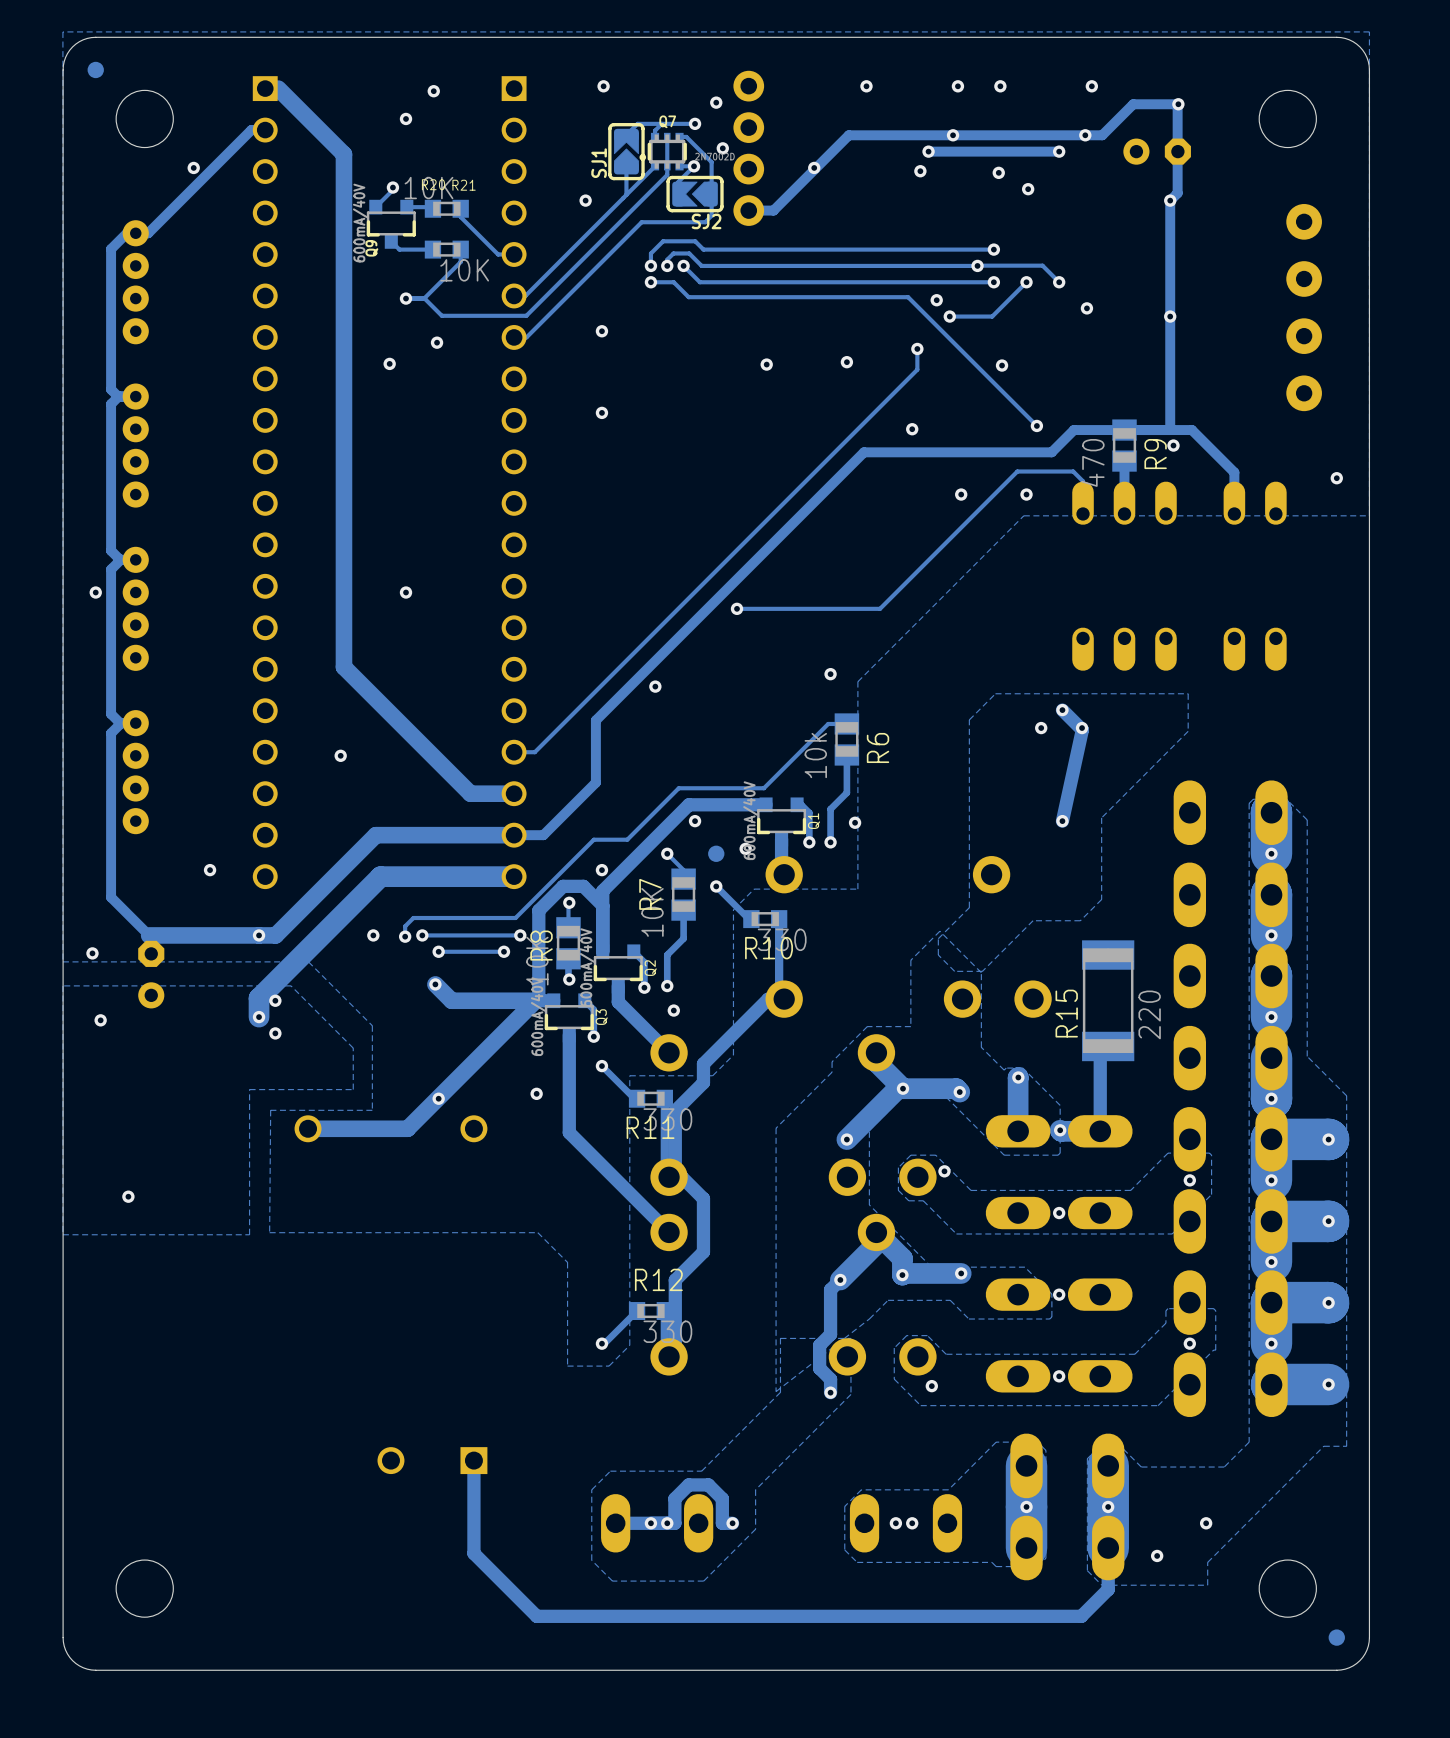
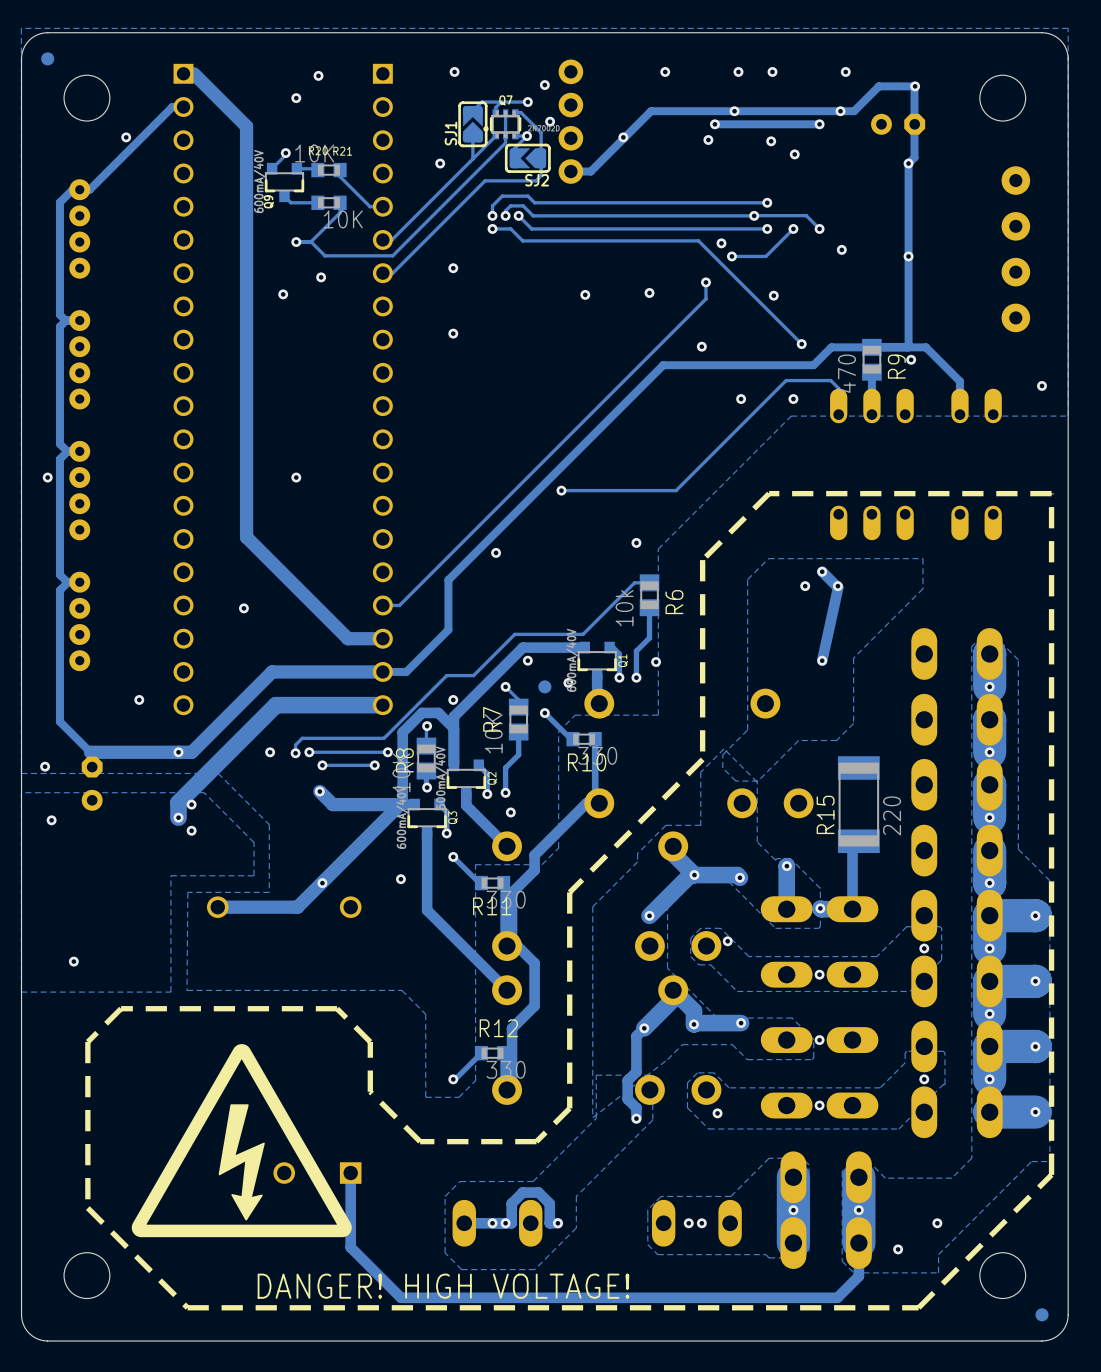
line: none -> (1051, 493) (769, 493) (702, 560) (702, 759) (569, 892) (569, 1108) (536, 1141) (420, 1141) (370, 1091) (370, 1041) (337, 1008) (121, 1008) (87, 1041) (87, 1208) (187, 1307) (918, 1307) (1051, 1174) (1051, 493)
drawing: none -> [131, 1044, 352, 1238]
text: none -> DANGER! HIGH VOLTAGE! (443, 1286)

